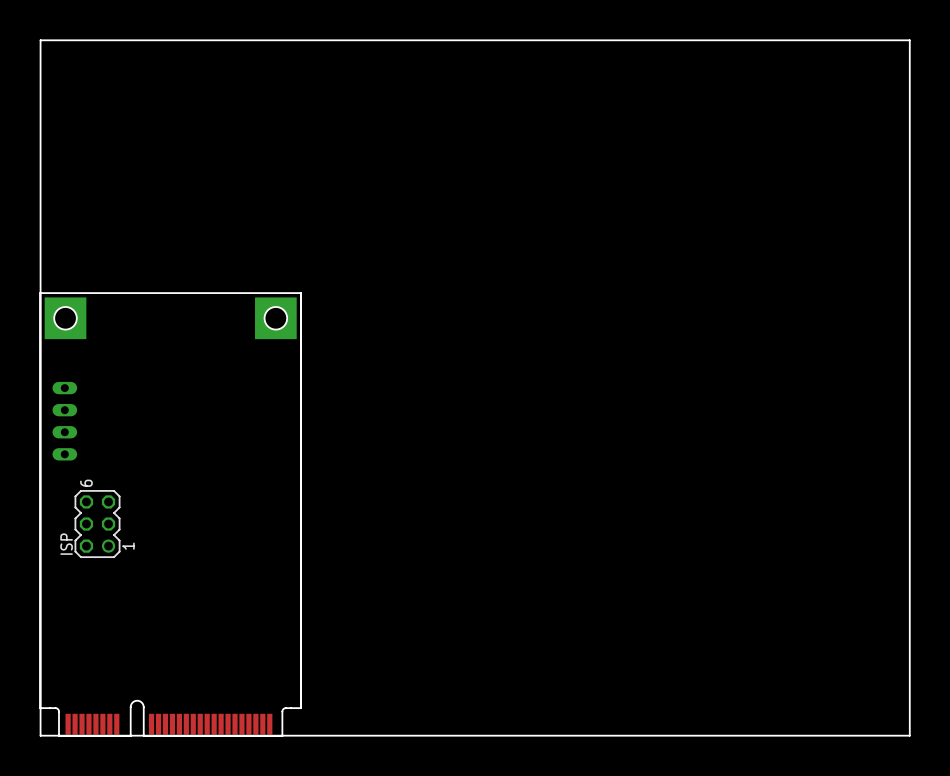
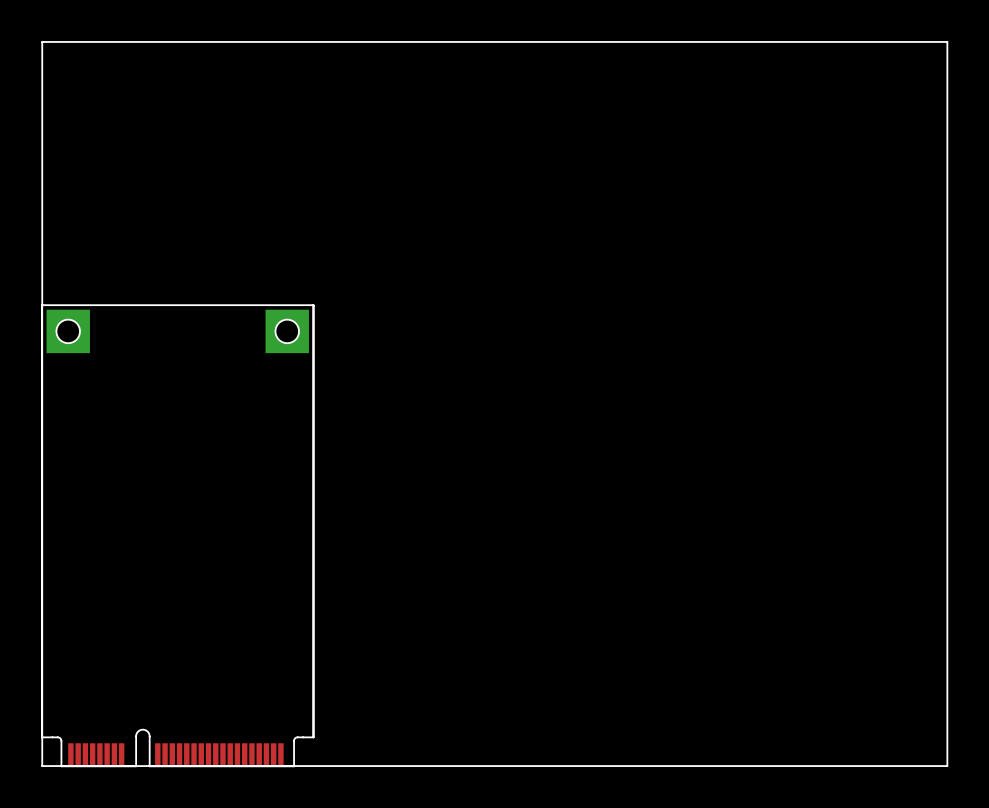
part: (64, 421) -> none
ISP: (97, 524) -> none

